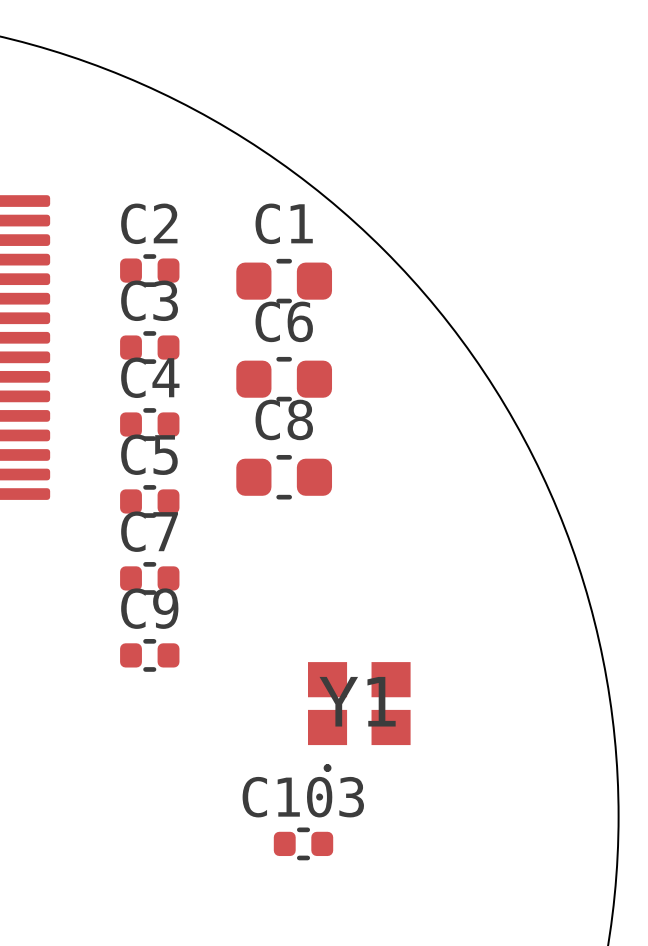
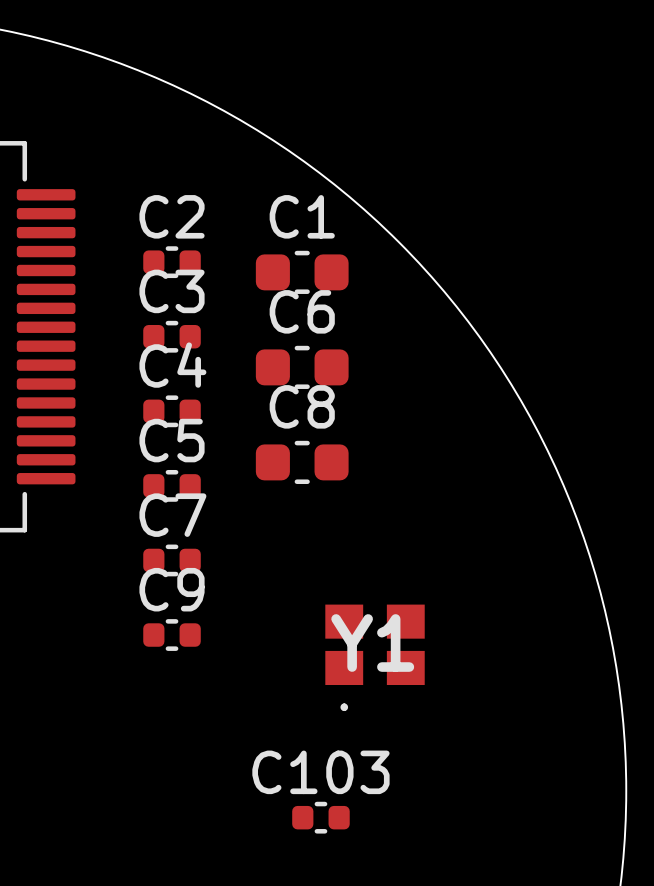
Y1 position: (359, 717) -> (375, 657)

